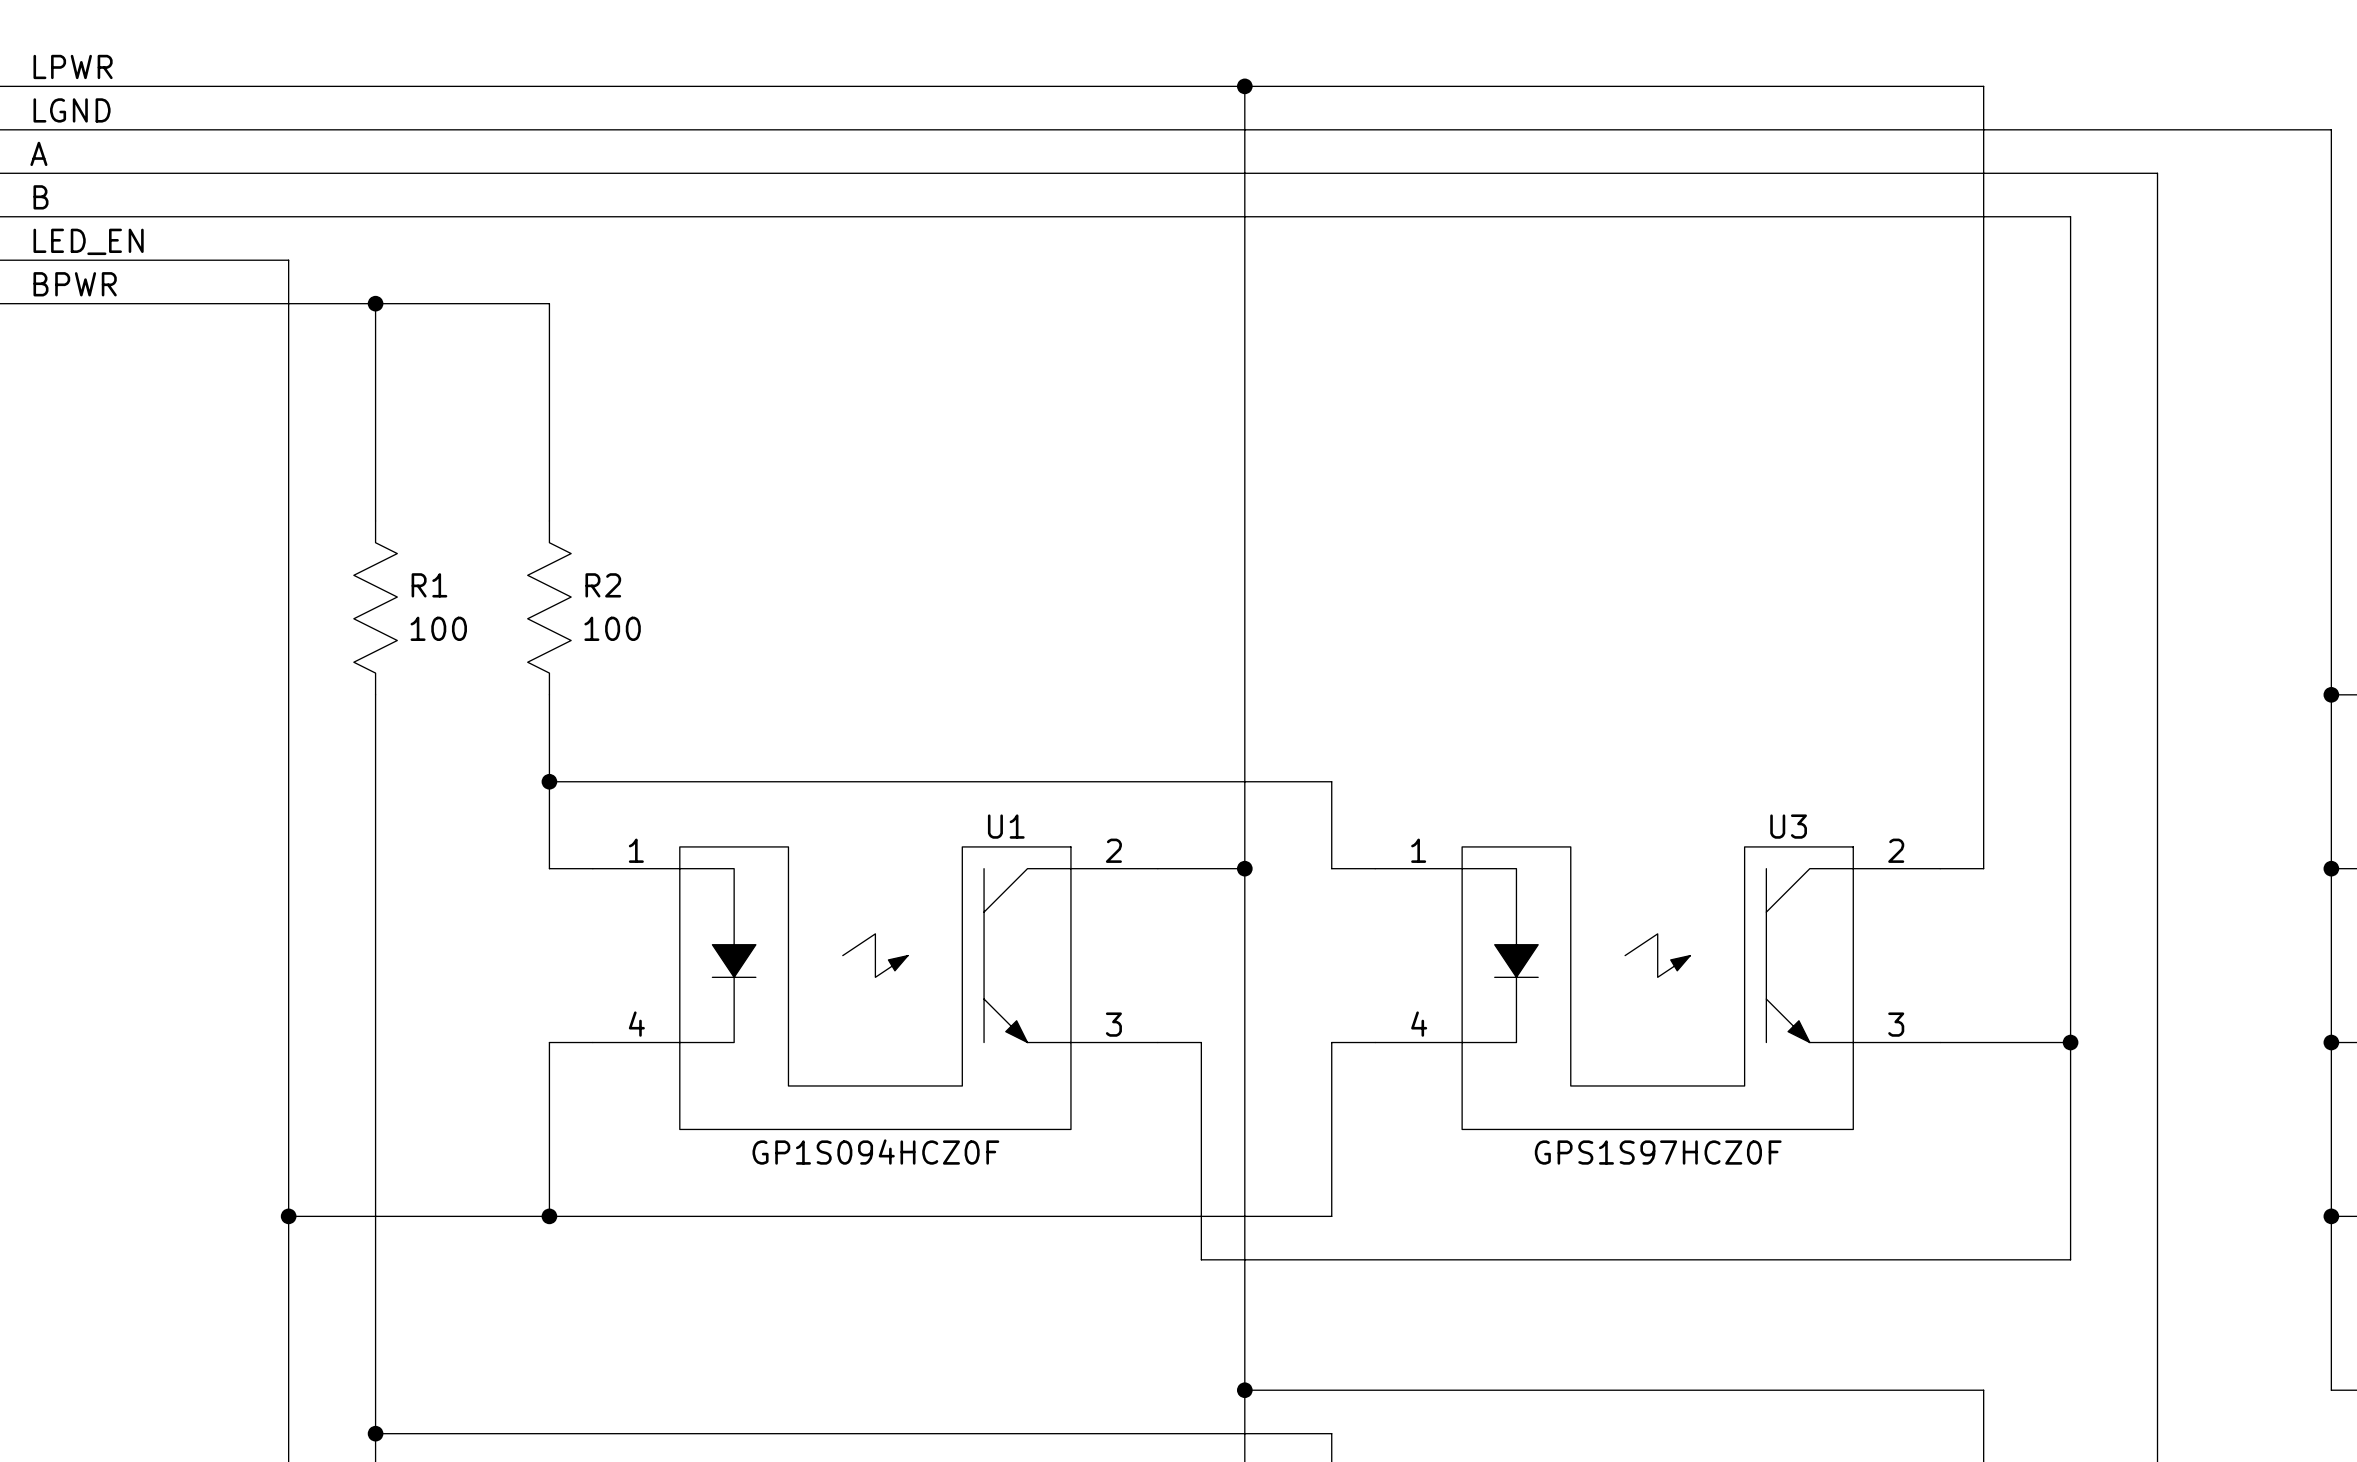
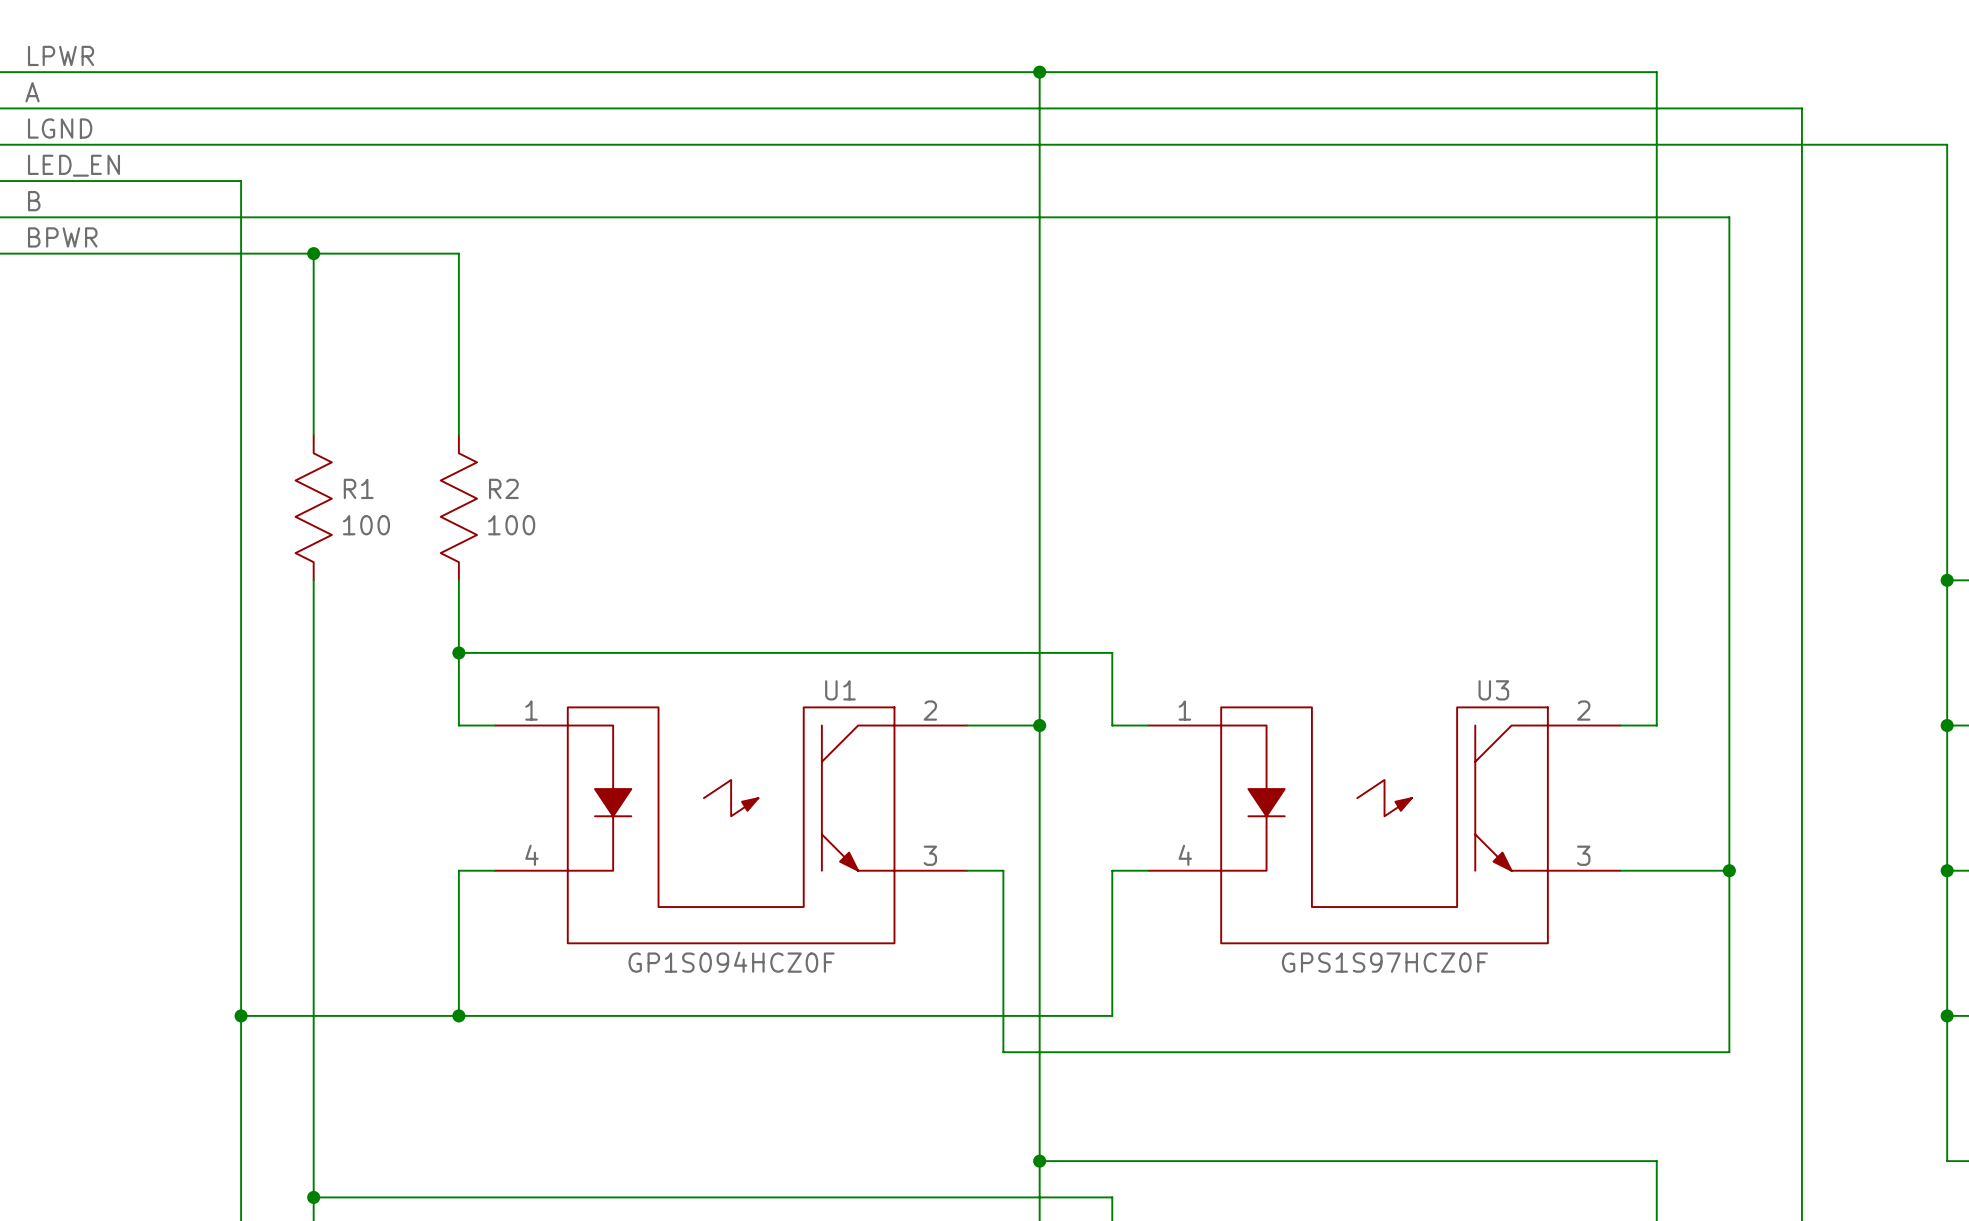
label: LGND (72, 110) -> A (32, 92)
wire: (2157, 129) (2331, 129) (2331, 173) -> (1801, 108) (1801, 144) (1947, 144)
label: A (38, 153) -> LGND (60, 128)
label: B (40, 197) -> LED_EN (73, 165)
wire: (288, 216) (2070, 216) (2070, 260) -> (241, 181) (241, 217) (1729, 217)
label: LED_EN (88, 241) -> B (34, 201)

